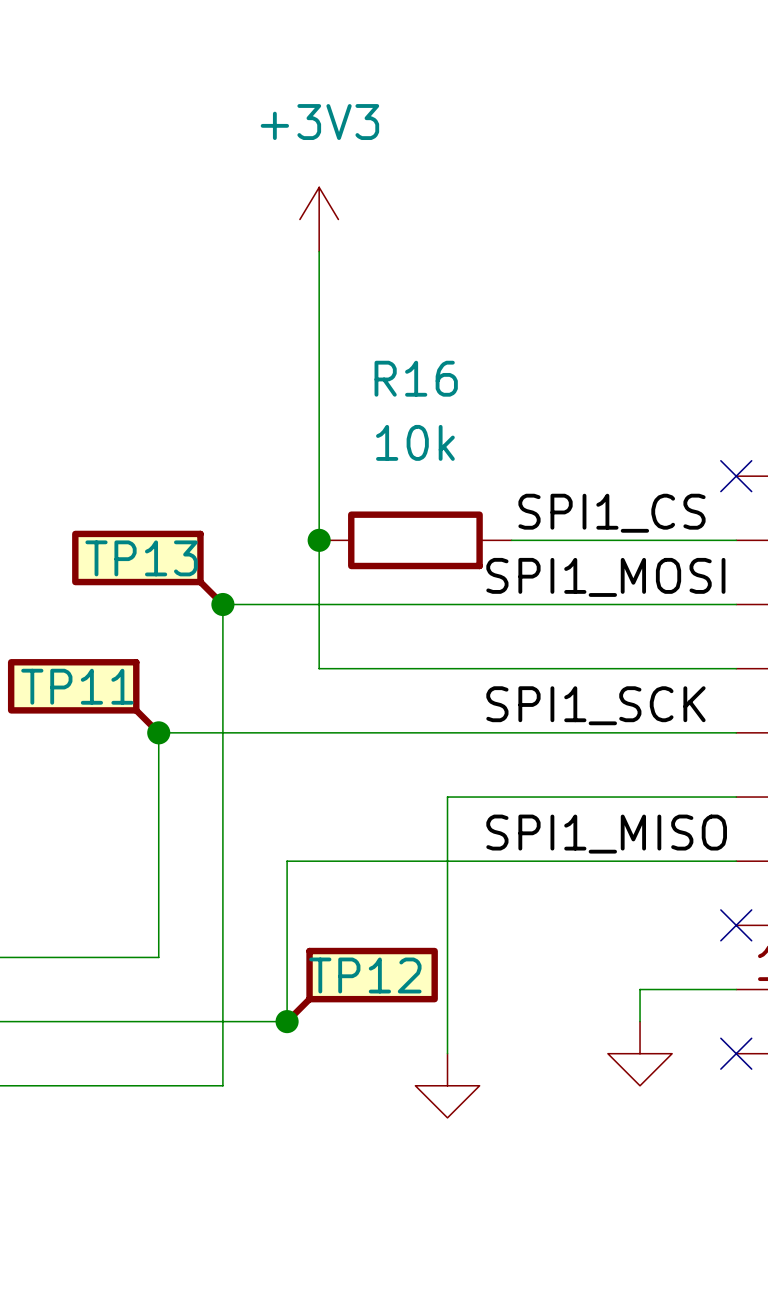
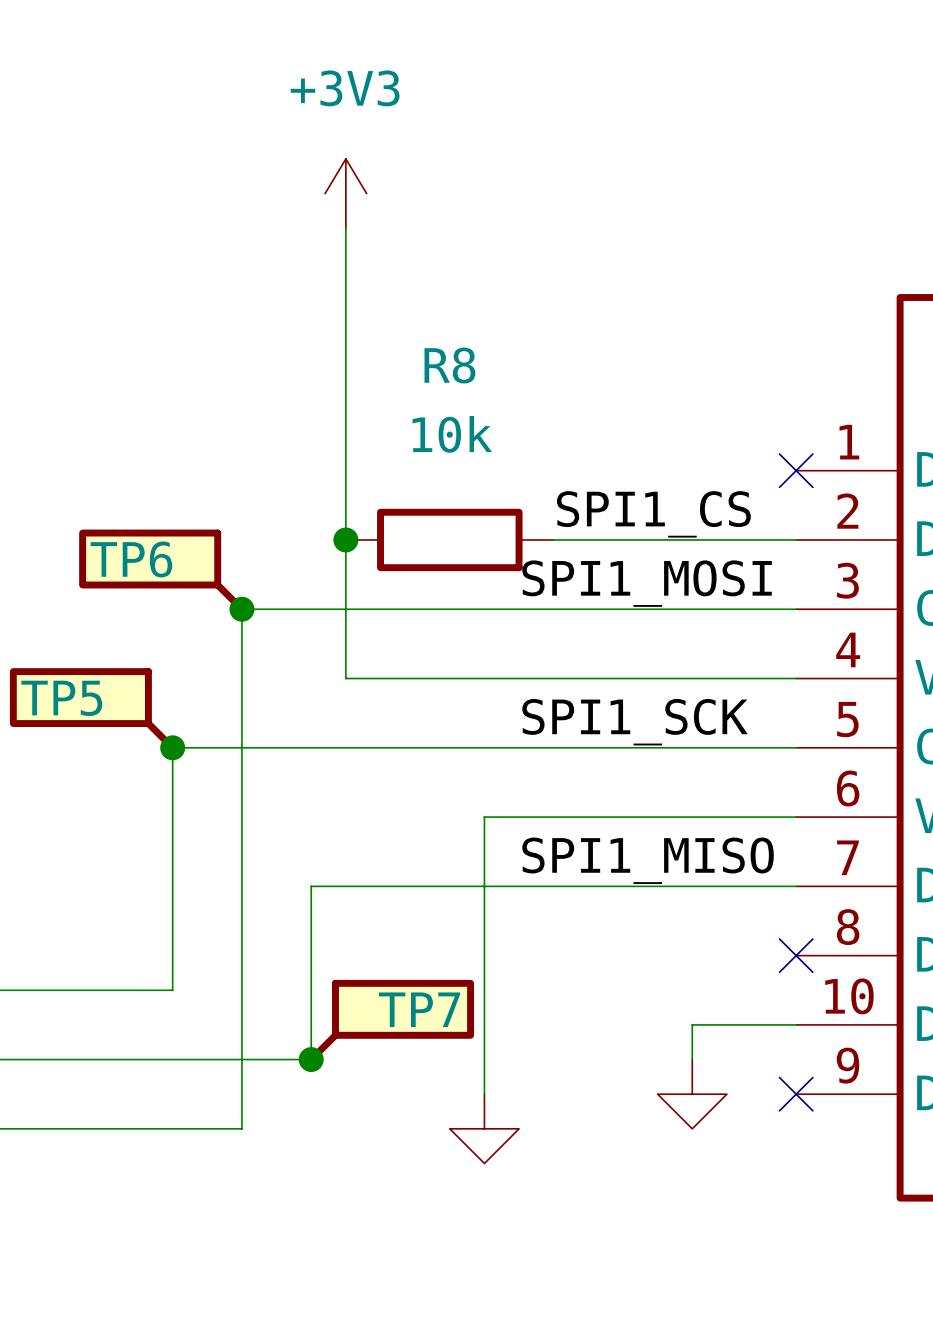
R16 name: R16 (416, 378) -> R8 (449, 365)
TP13 name: TP13 (141, 558) -> TP6 (131, 559)
TP11 name: TP11 (77, 686) -> TP5 (61, 698)
TP12 name: TP12 (365, 975) -> TP7 (419, 1009)

